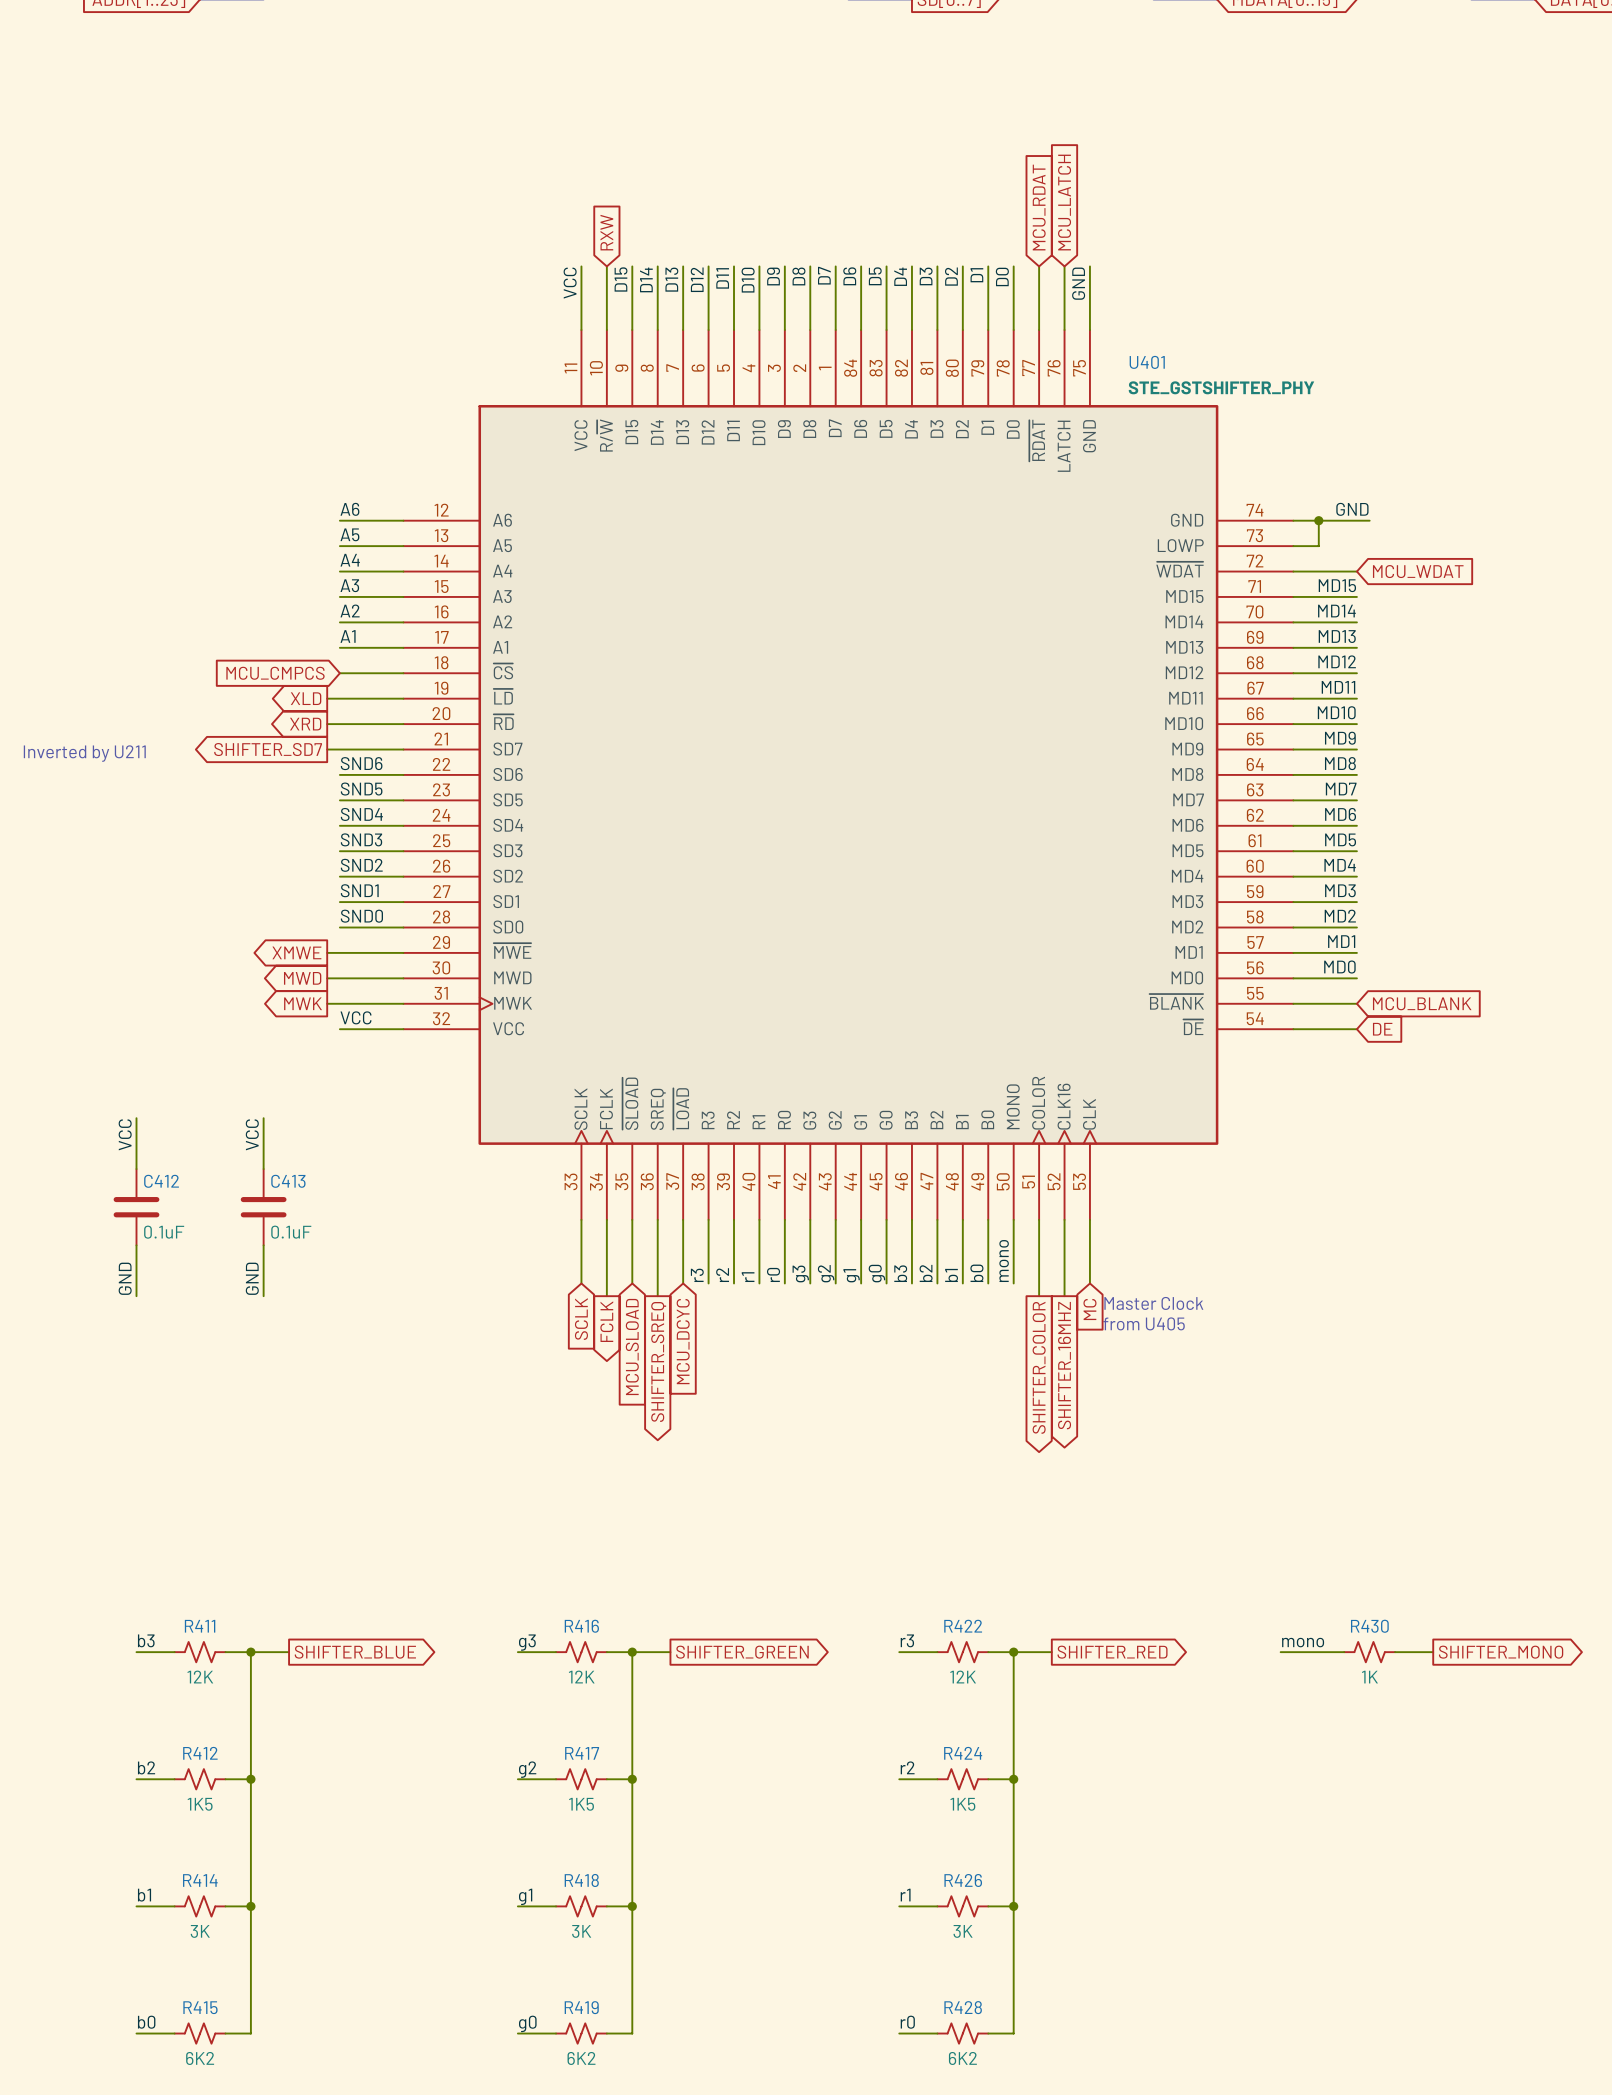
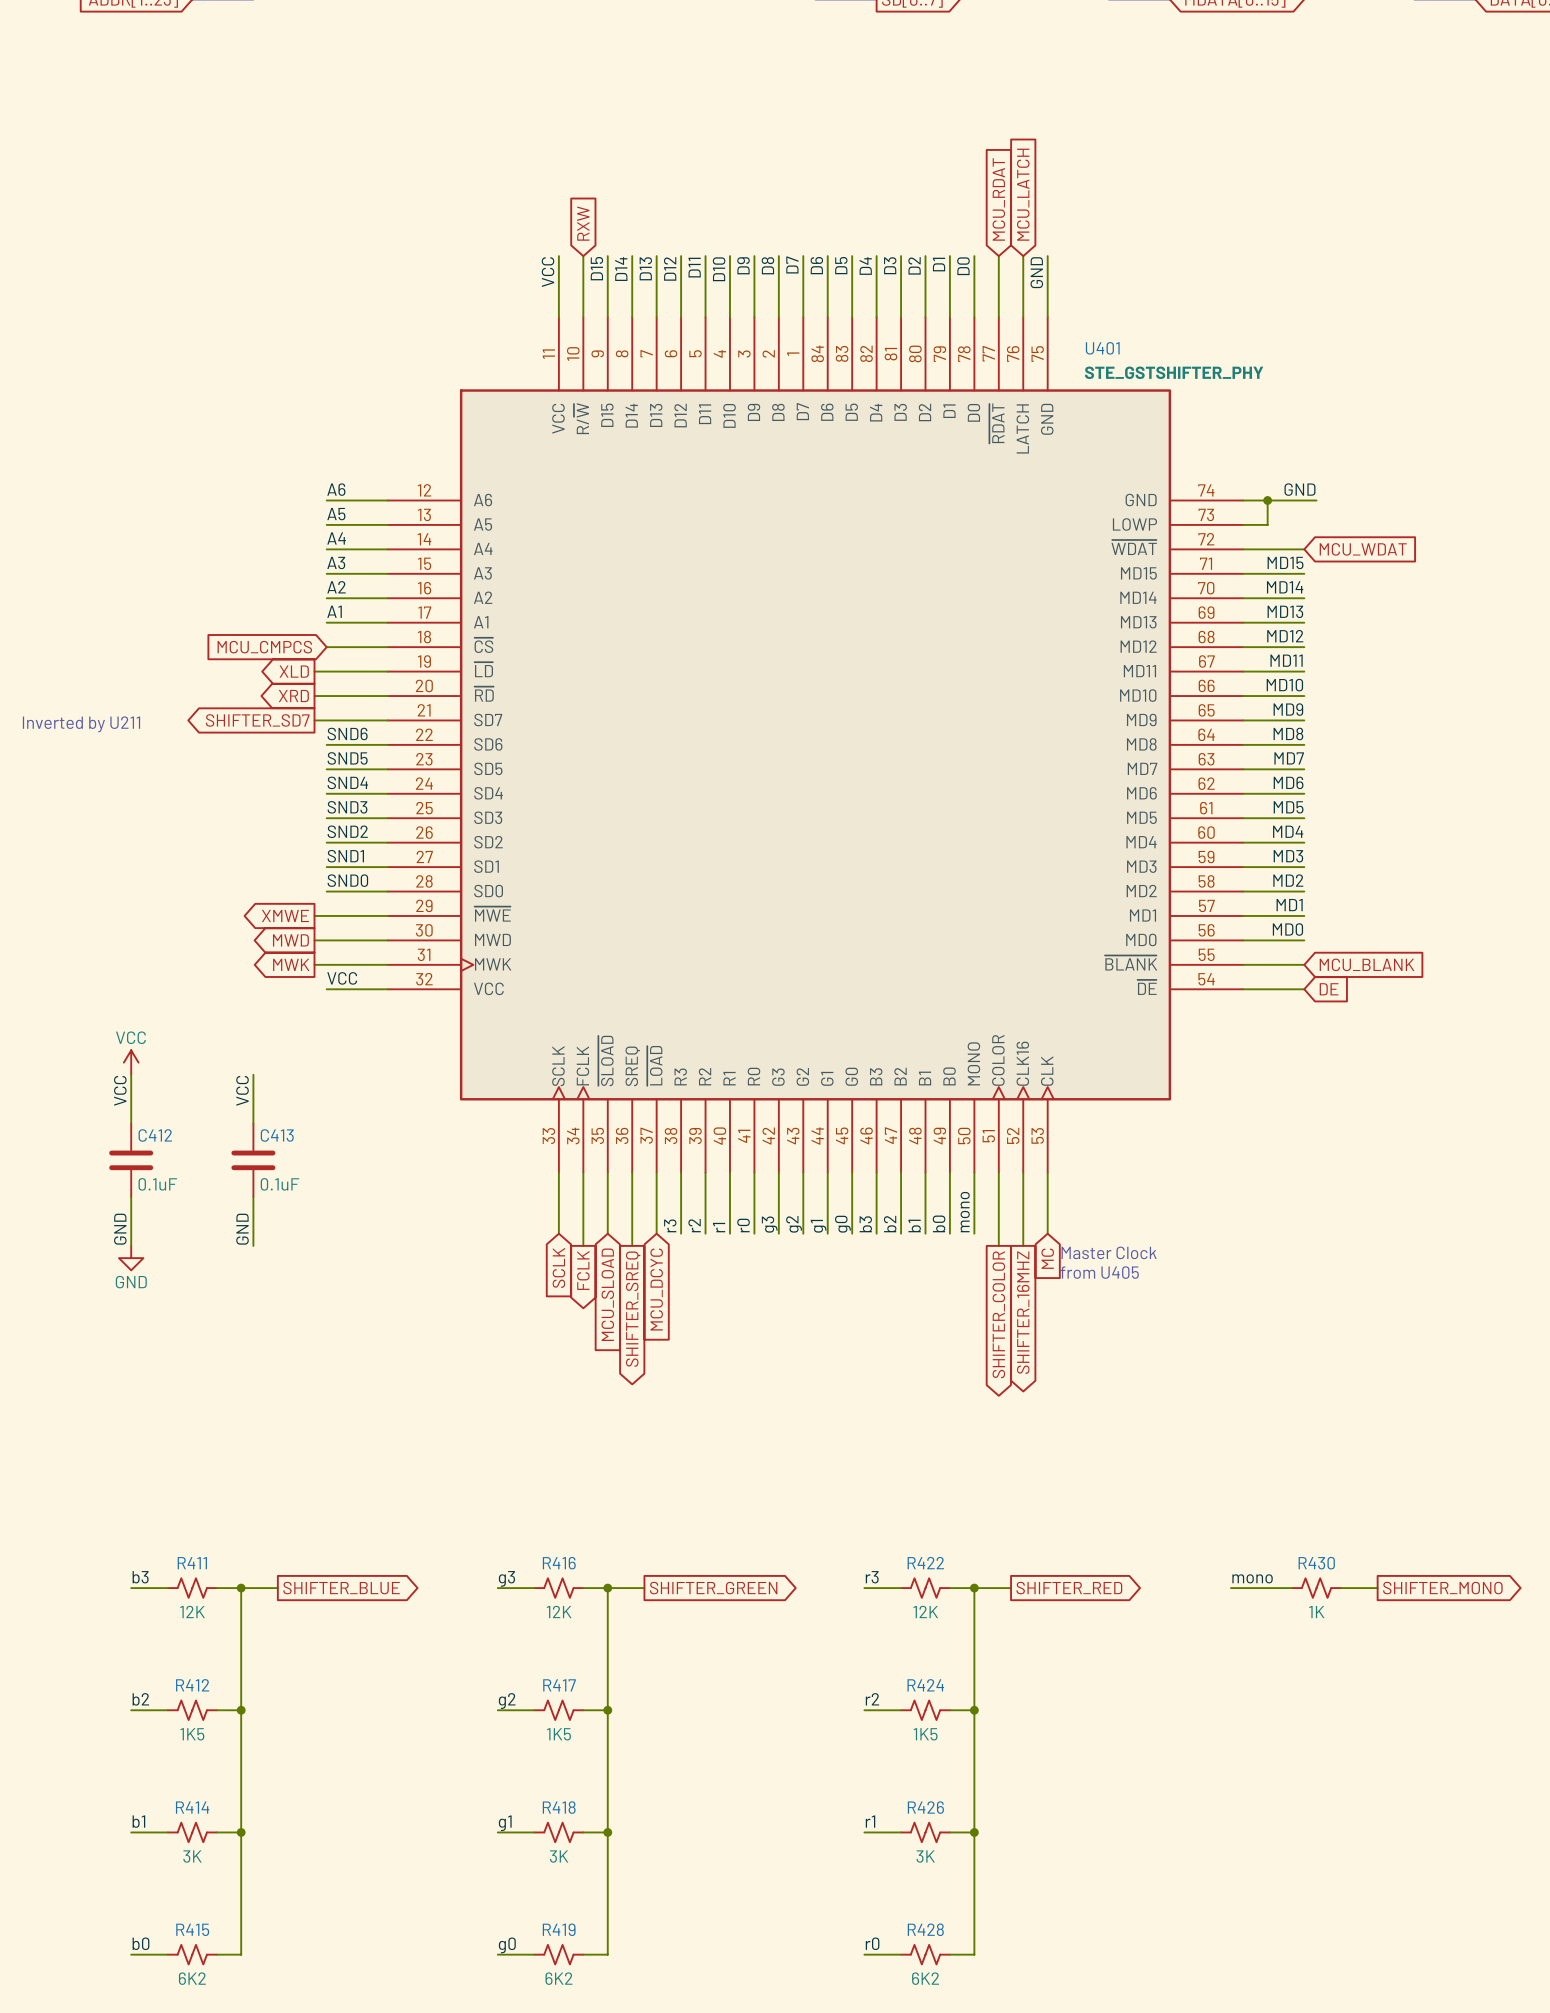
power symbol: none -> VCC (131, 1062)
power symbol: none -> GND (131, 1258)

